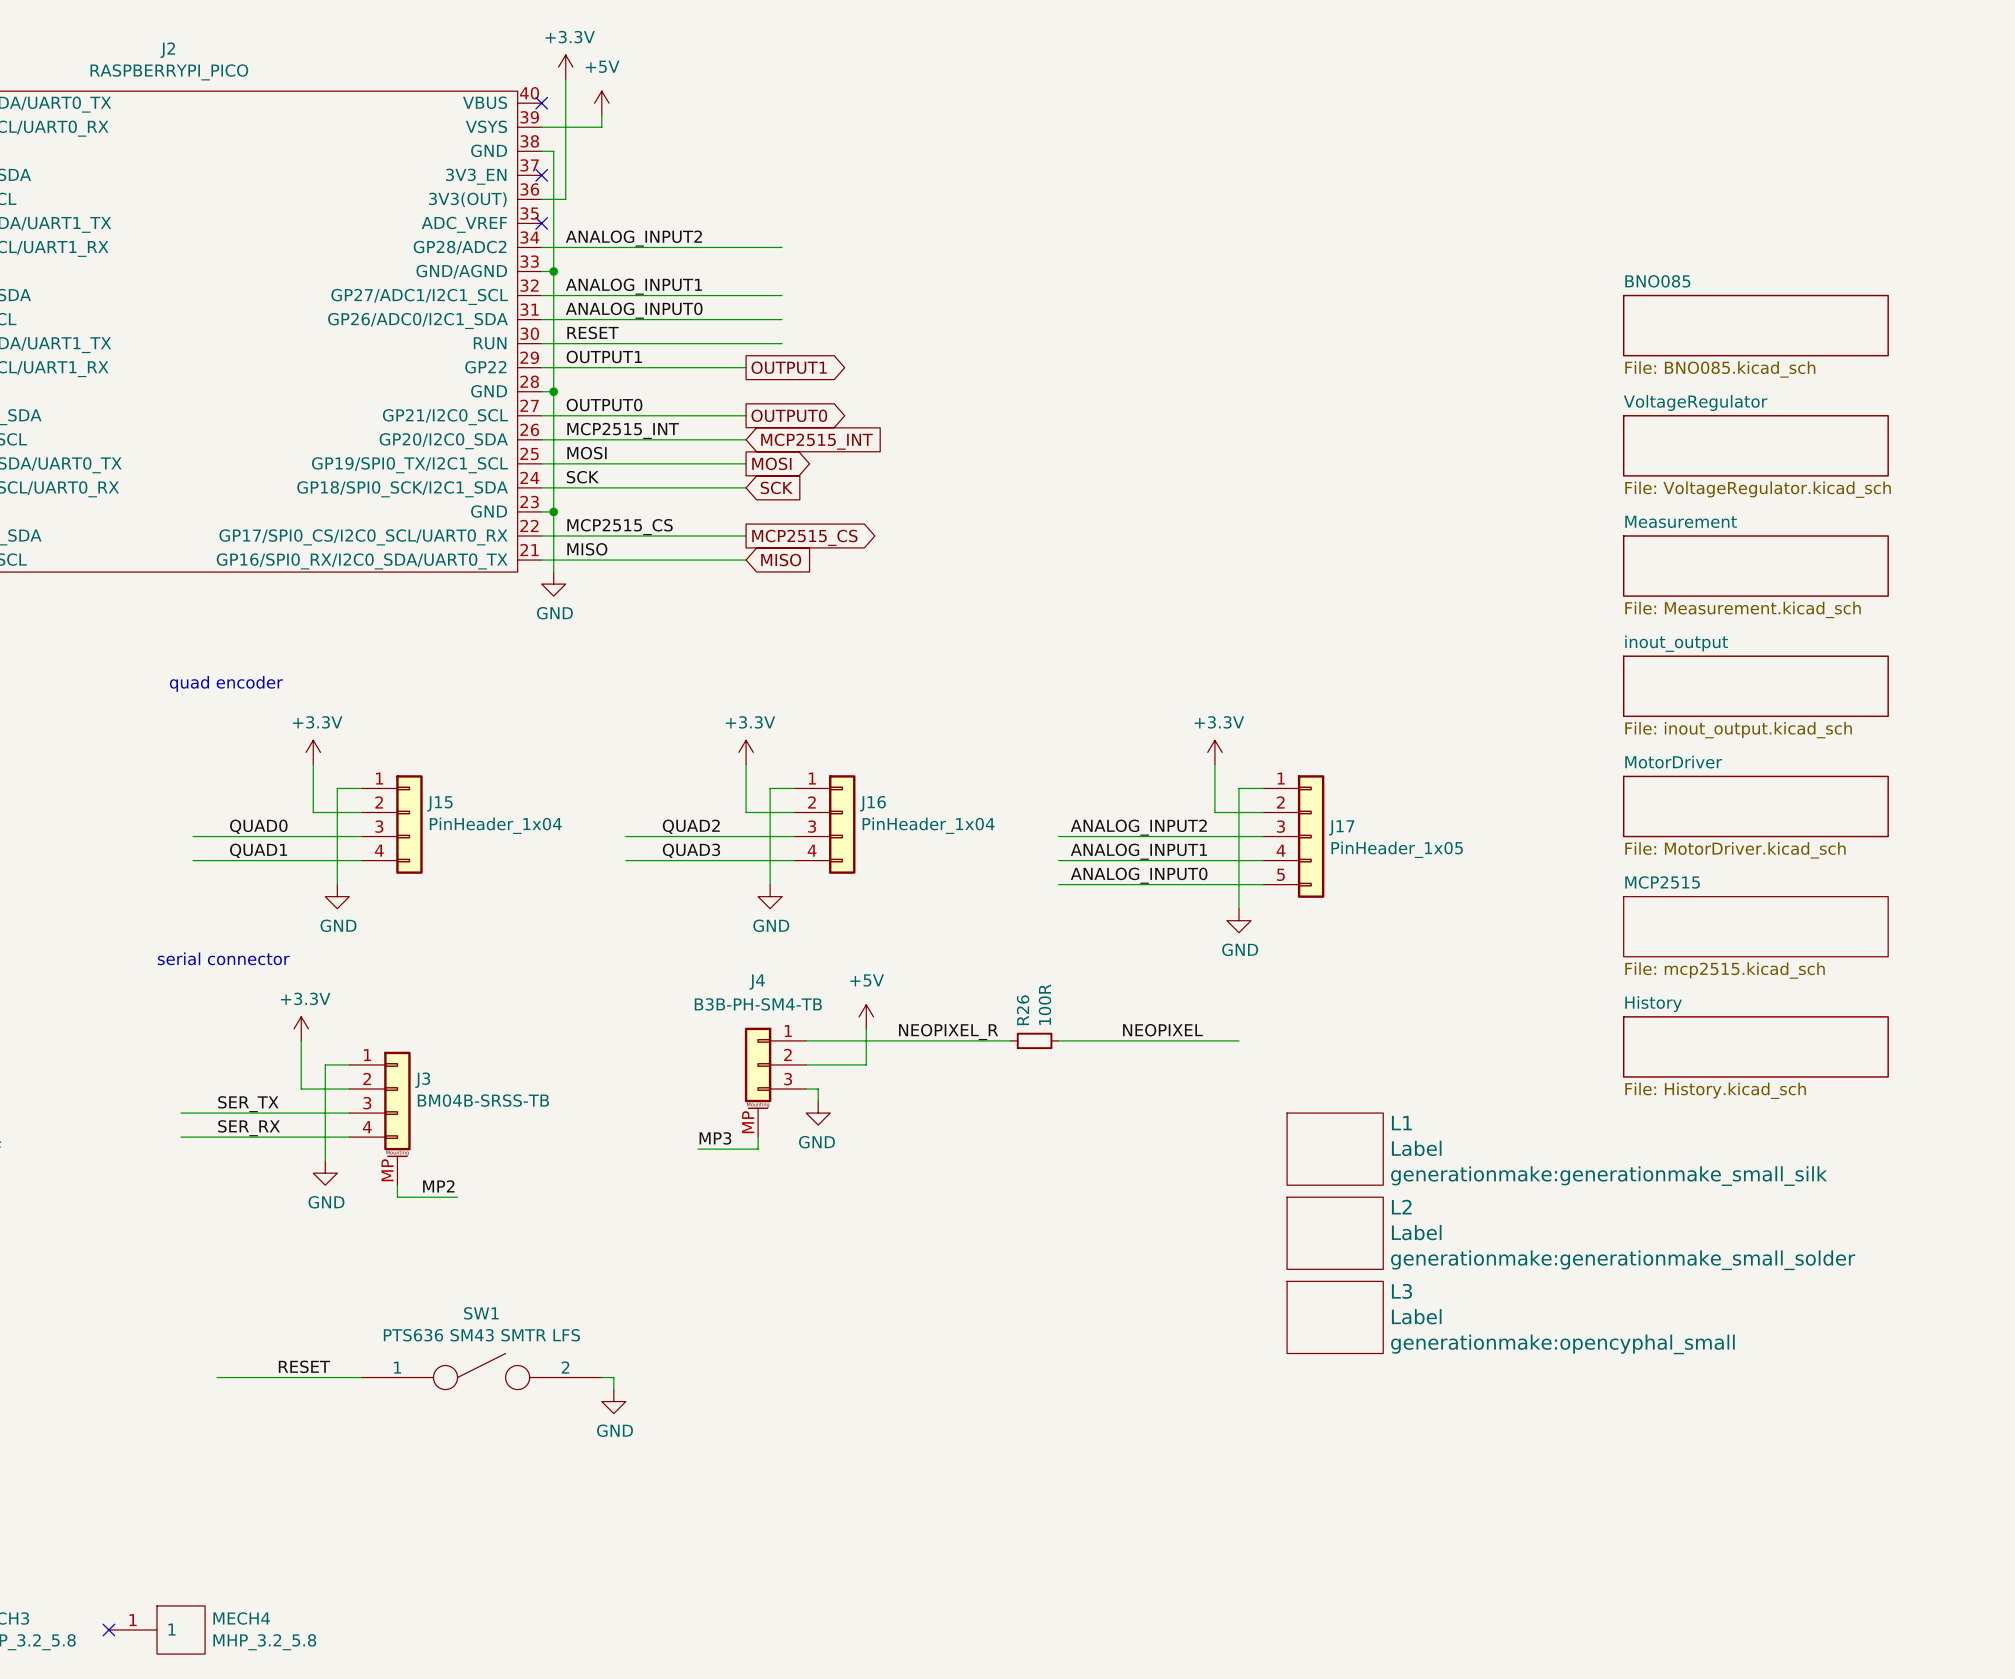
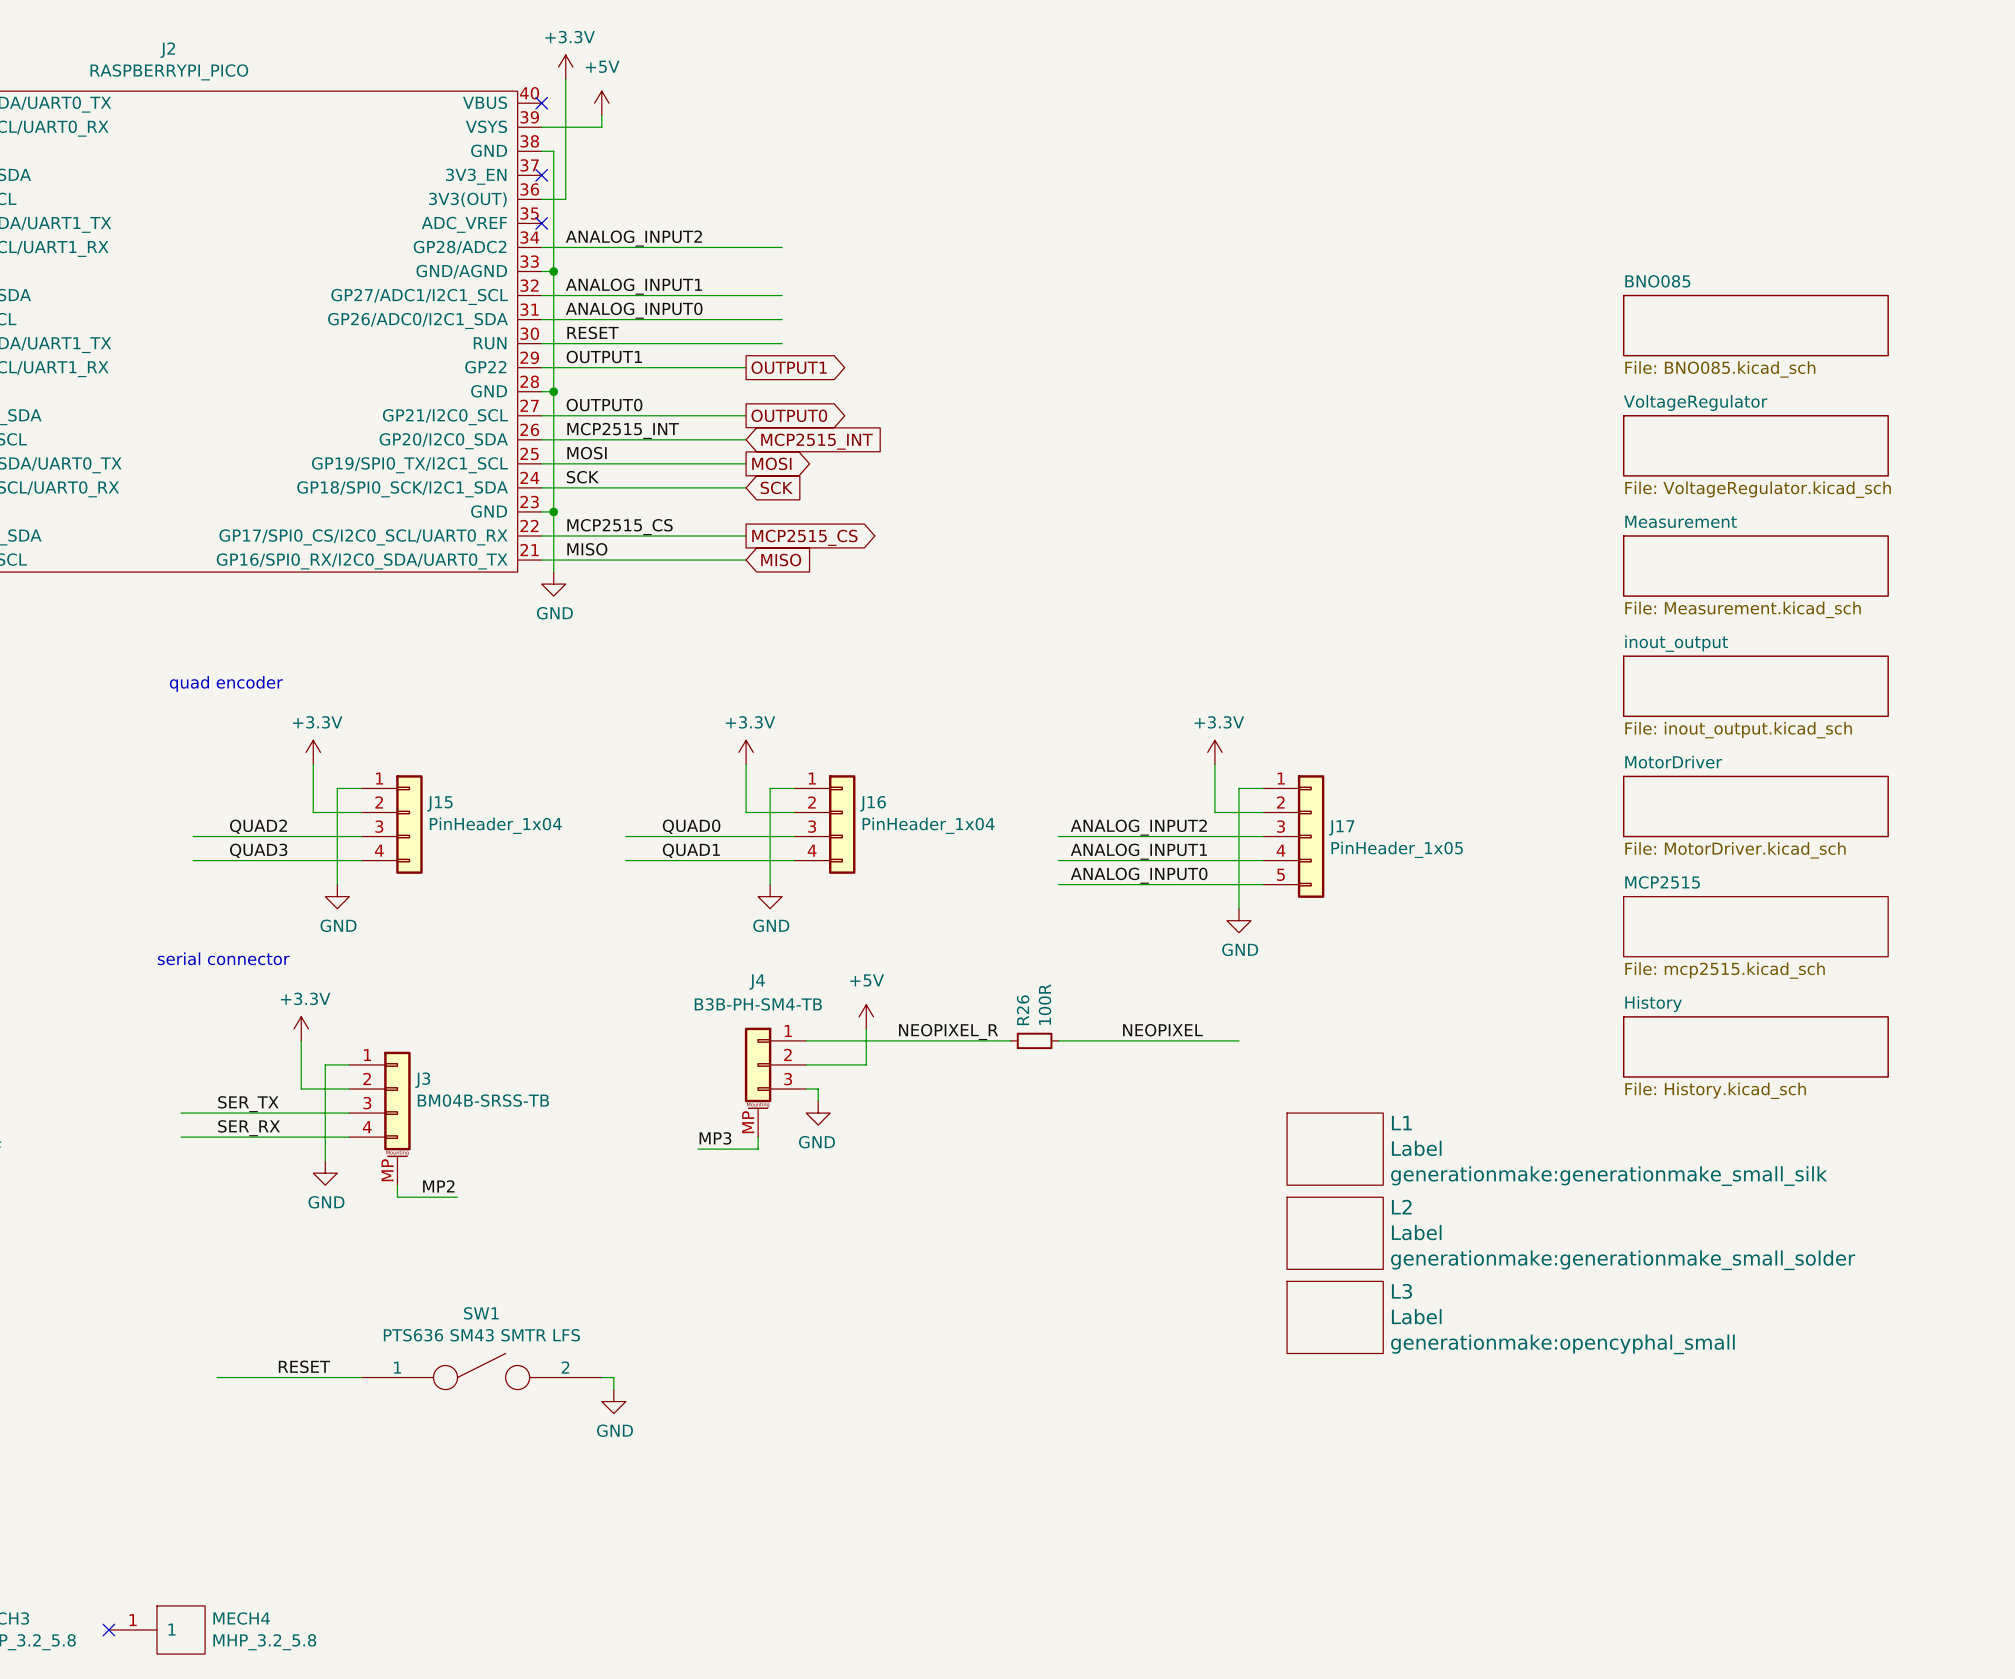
label: QUAD0 (258, 826) -> QUAD2 (258, 826)
label: QUAD2 (691, 826) -> QUAD0 (691, 826)
label: QUAD1 (258, 850) -> QUAD3 (258, 850)
label: QUAD3 (691, 850) -> QUAD1 (691, 850)

